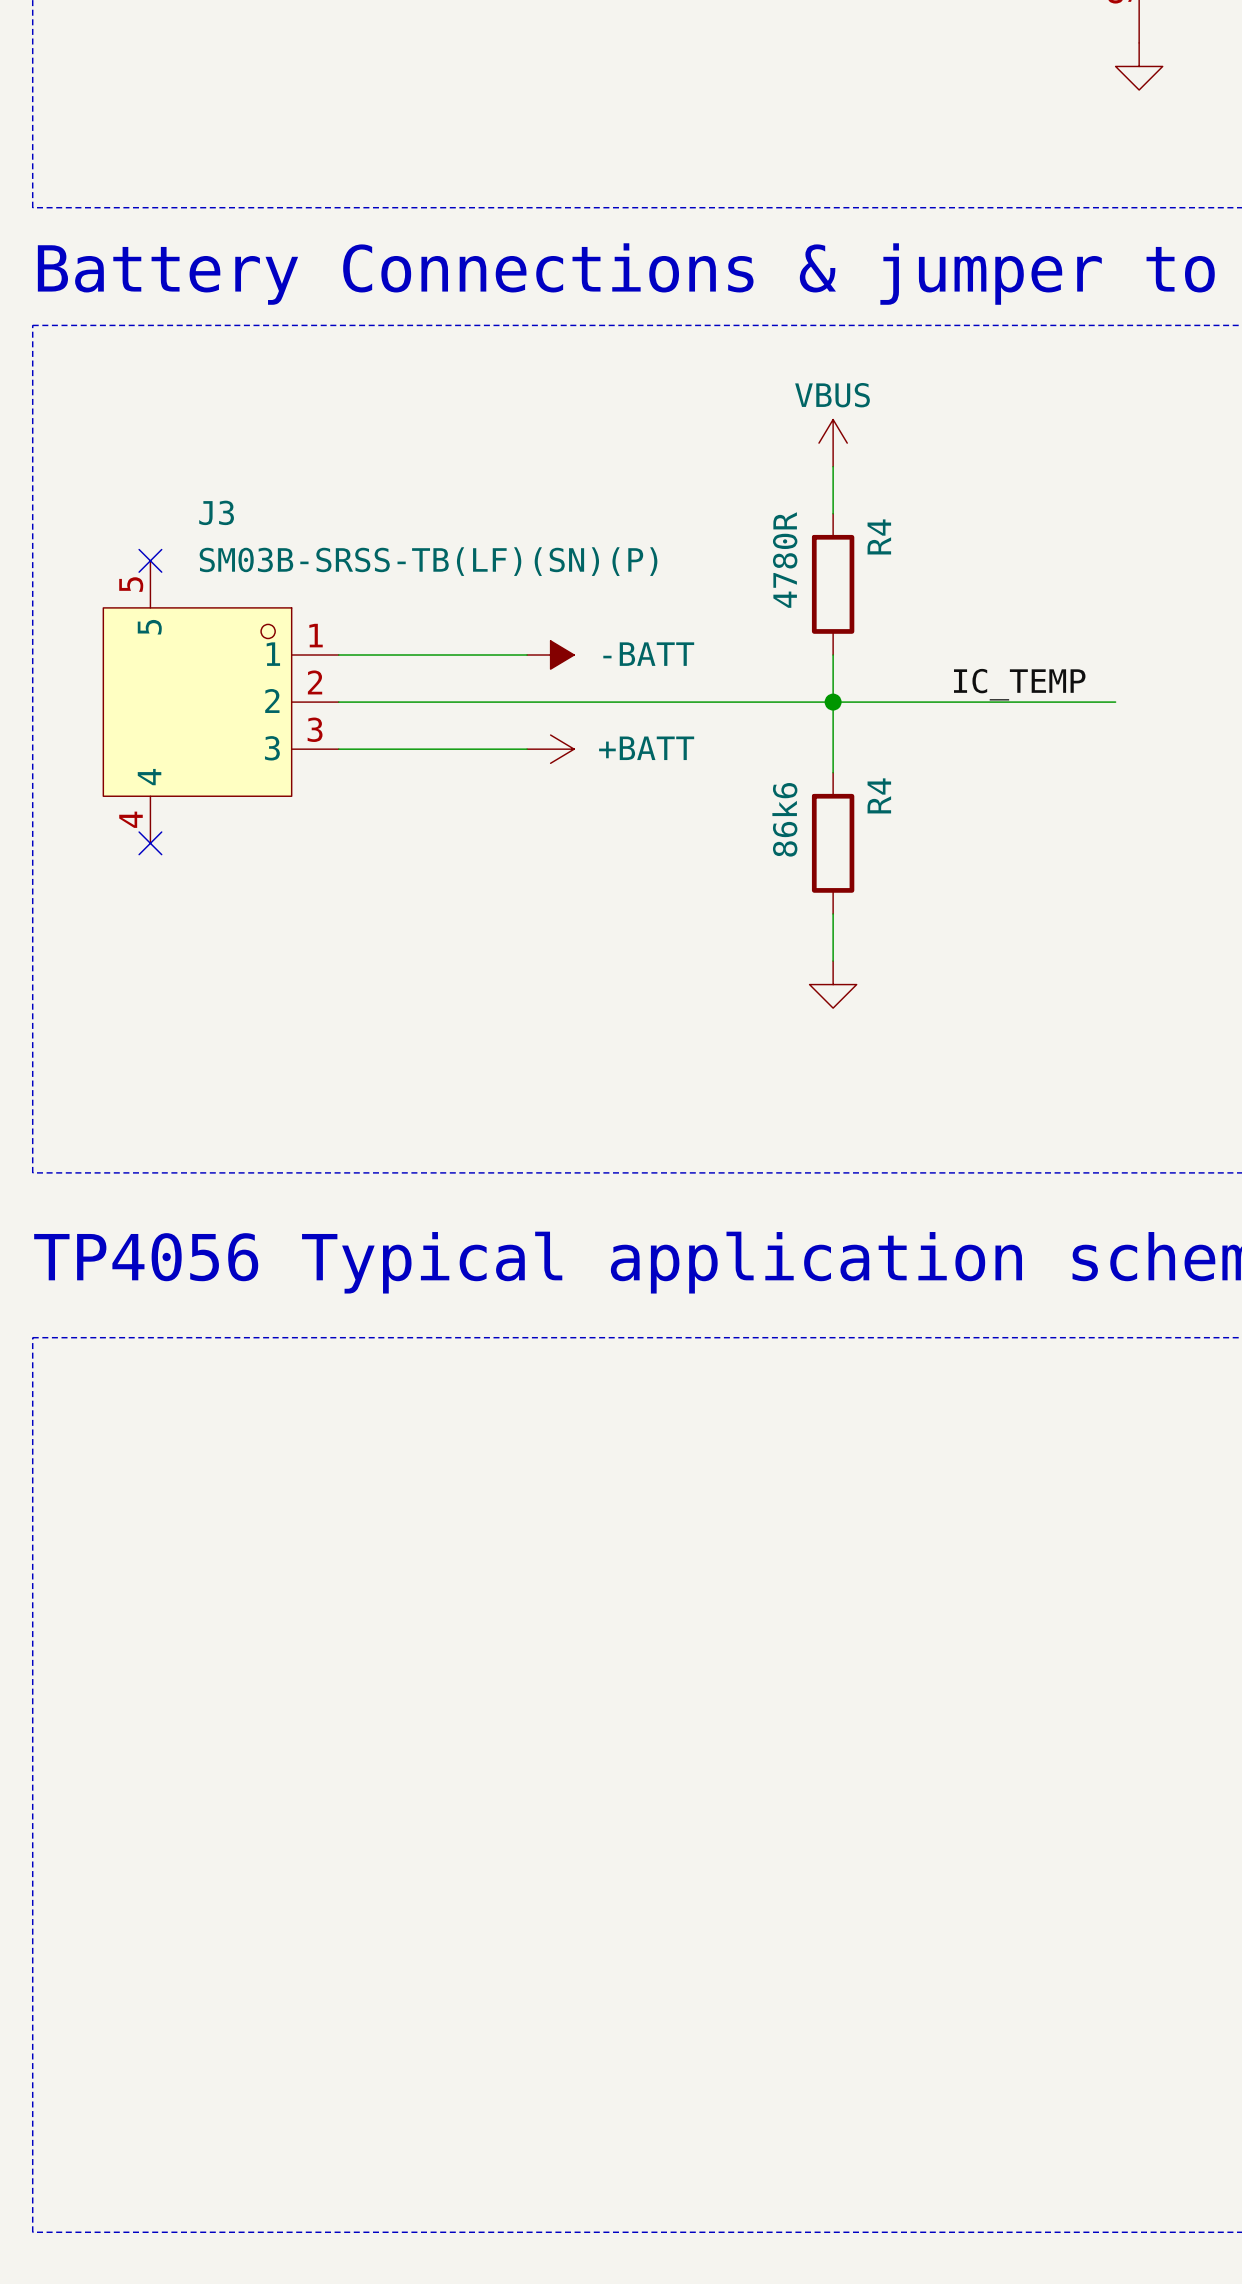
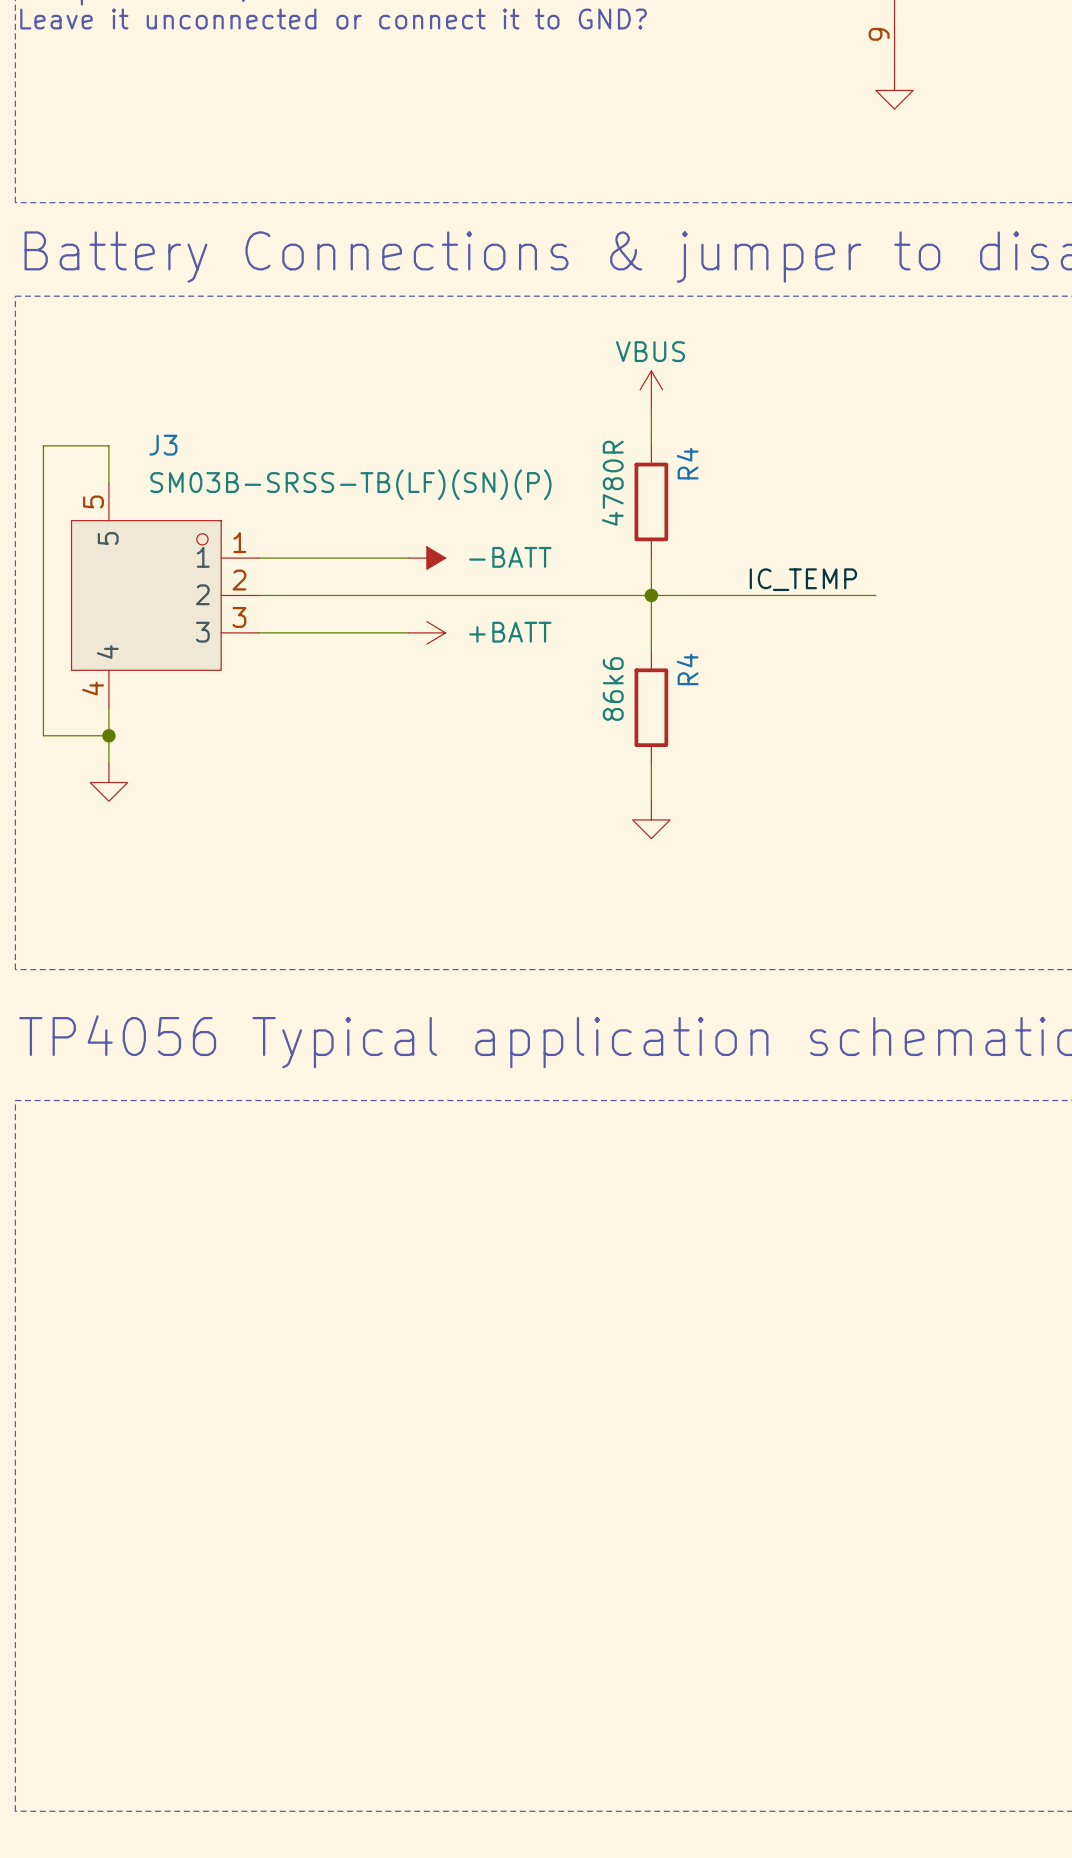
wire: none -> (108, 483) (108, 445) (43, 445) (43, 735) (108, 735)
no-connect mark: (150, 560) -> none
wire: none -> (108, 707) (108, 763)
no-connect mark: (150, 843) -> none
junction: none -> (108, 735)
power symbol: none -> (108, 782)

